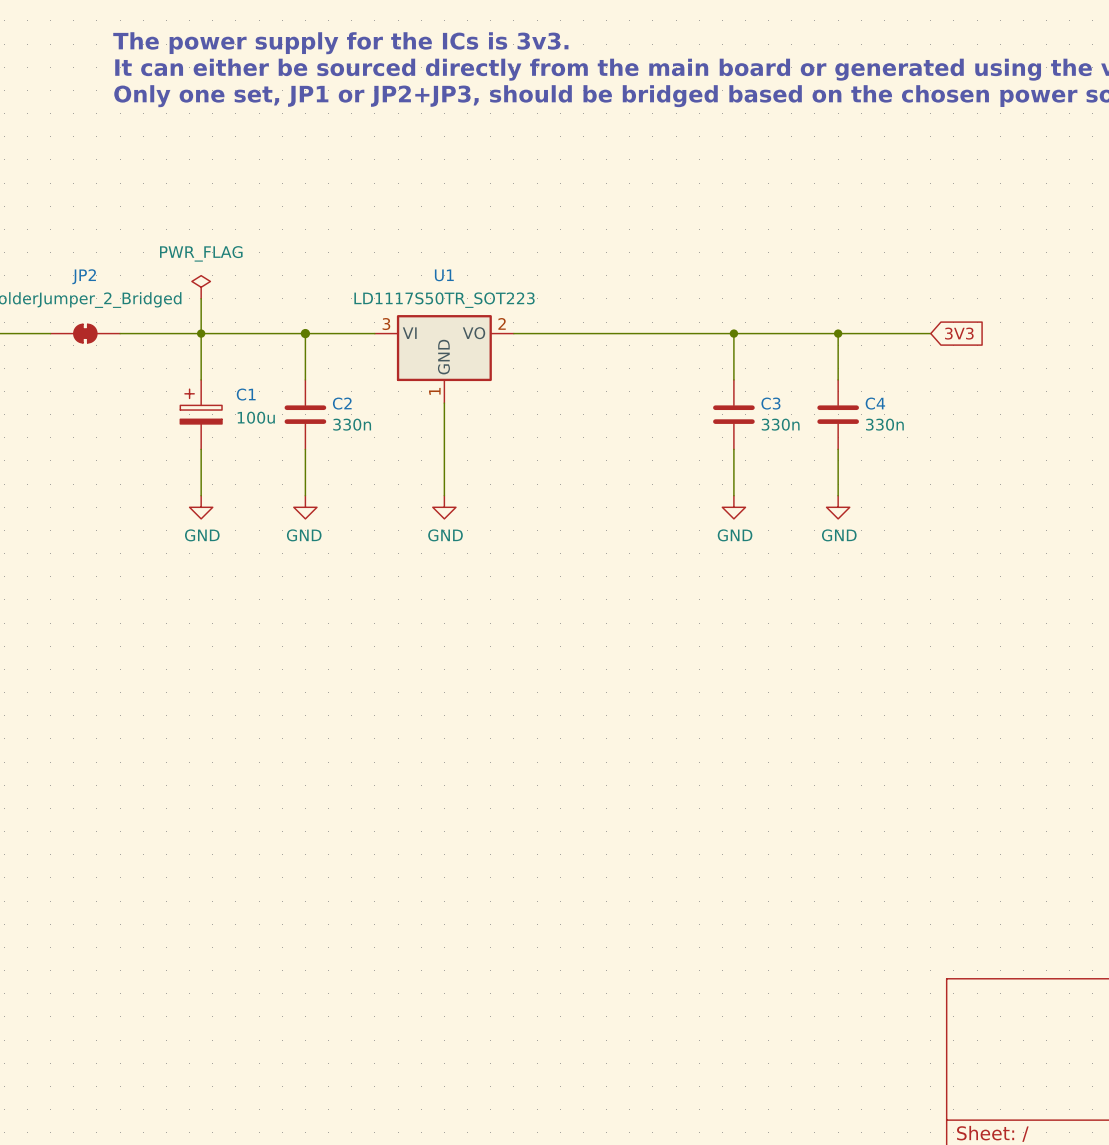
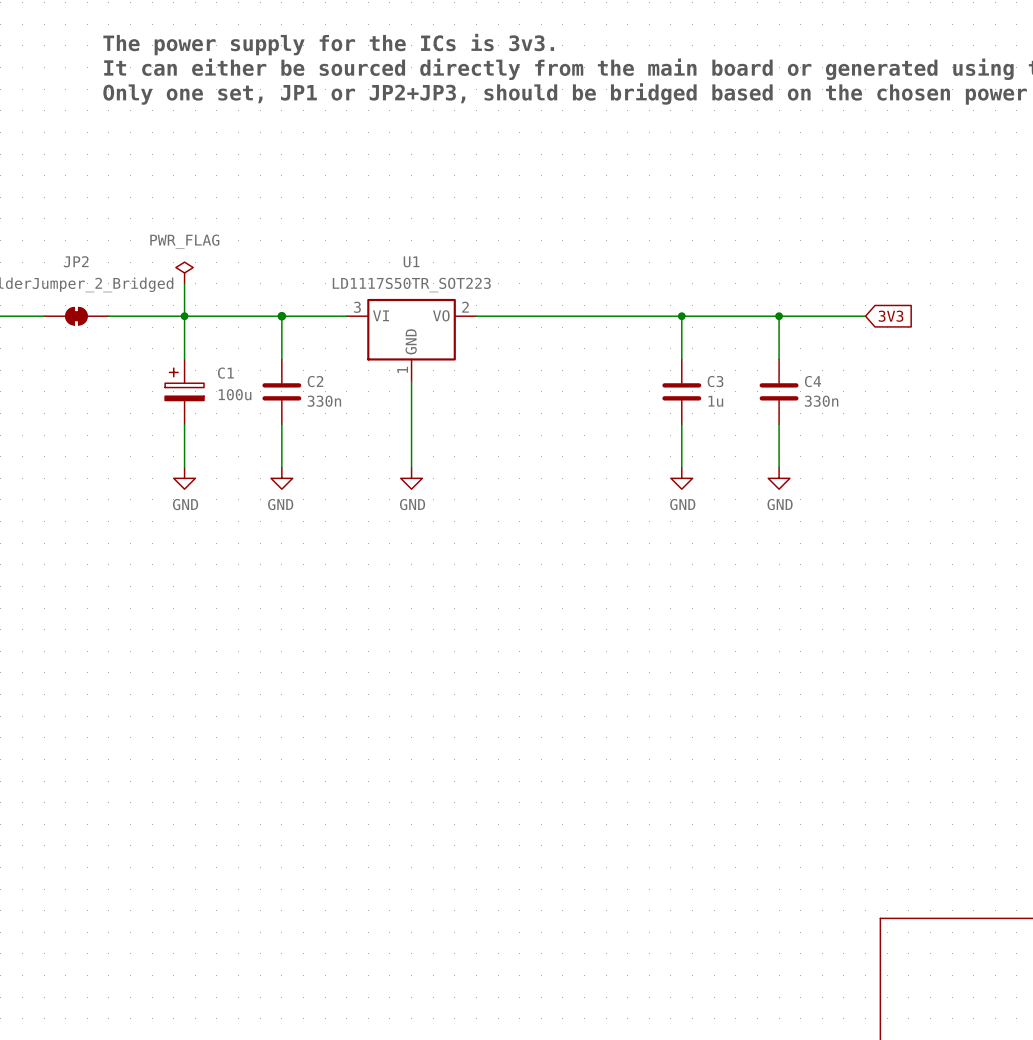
C3 value: 330n (780, 424) -> 1u (715, 401)

